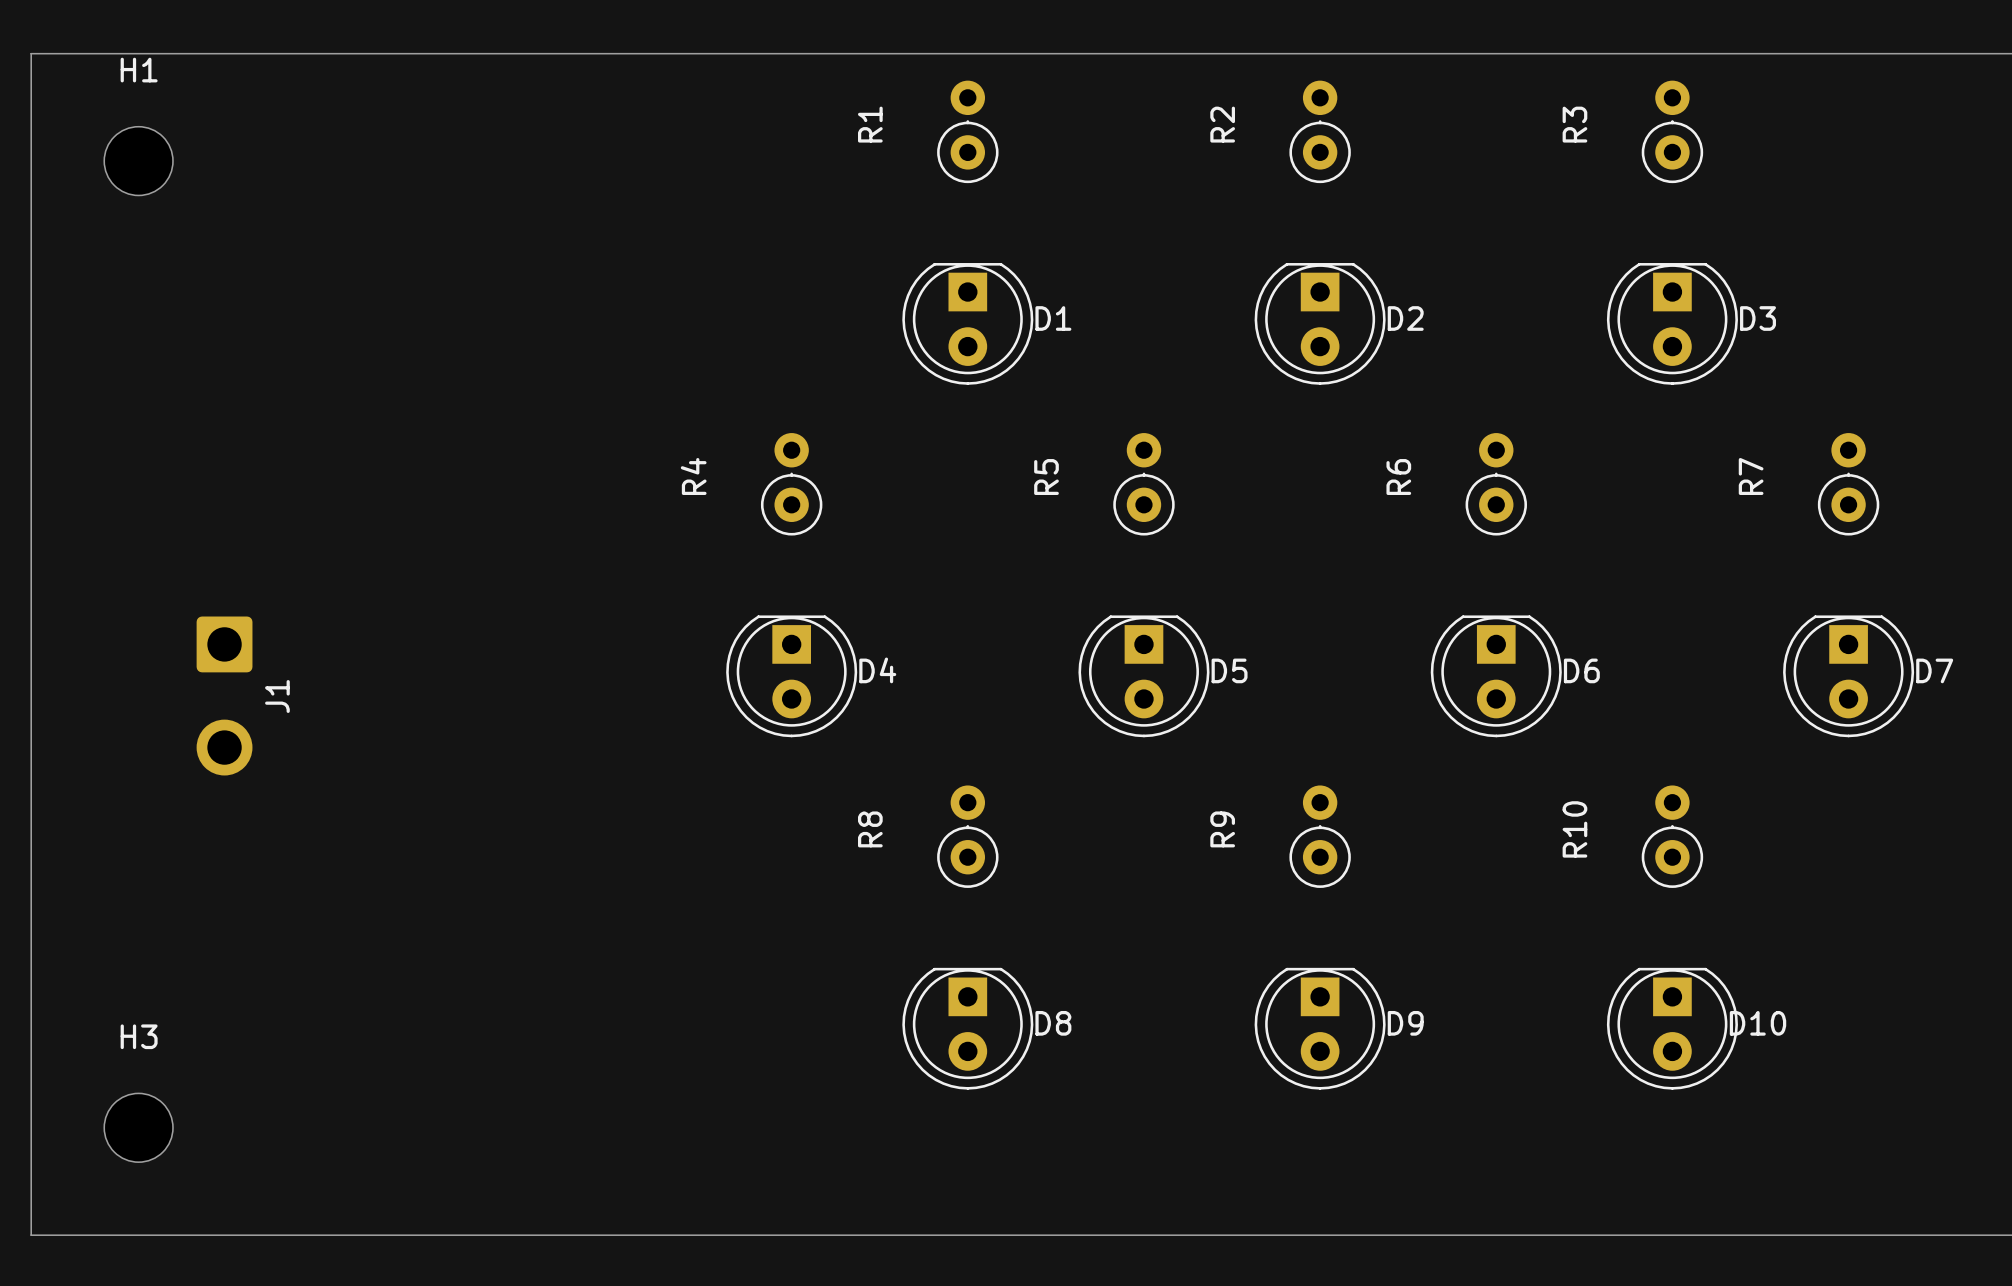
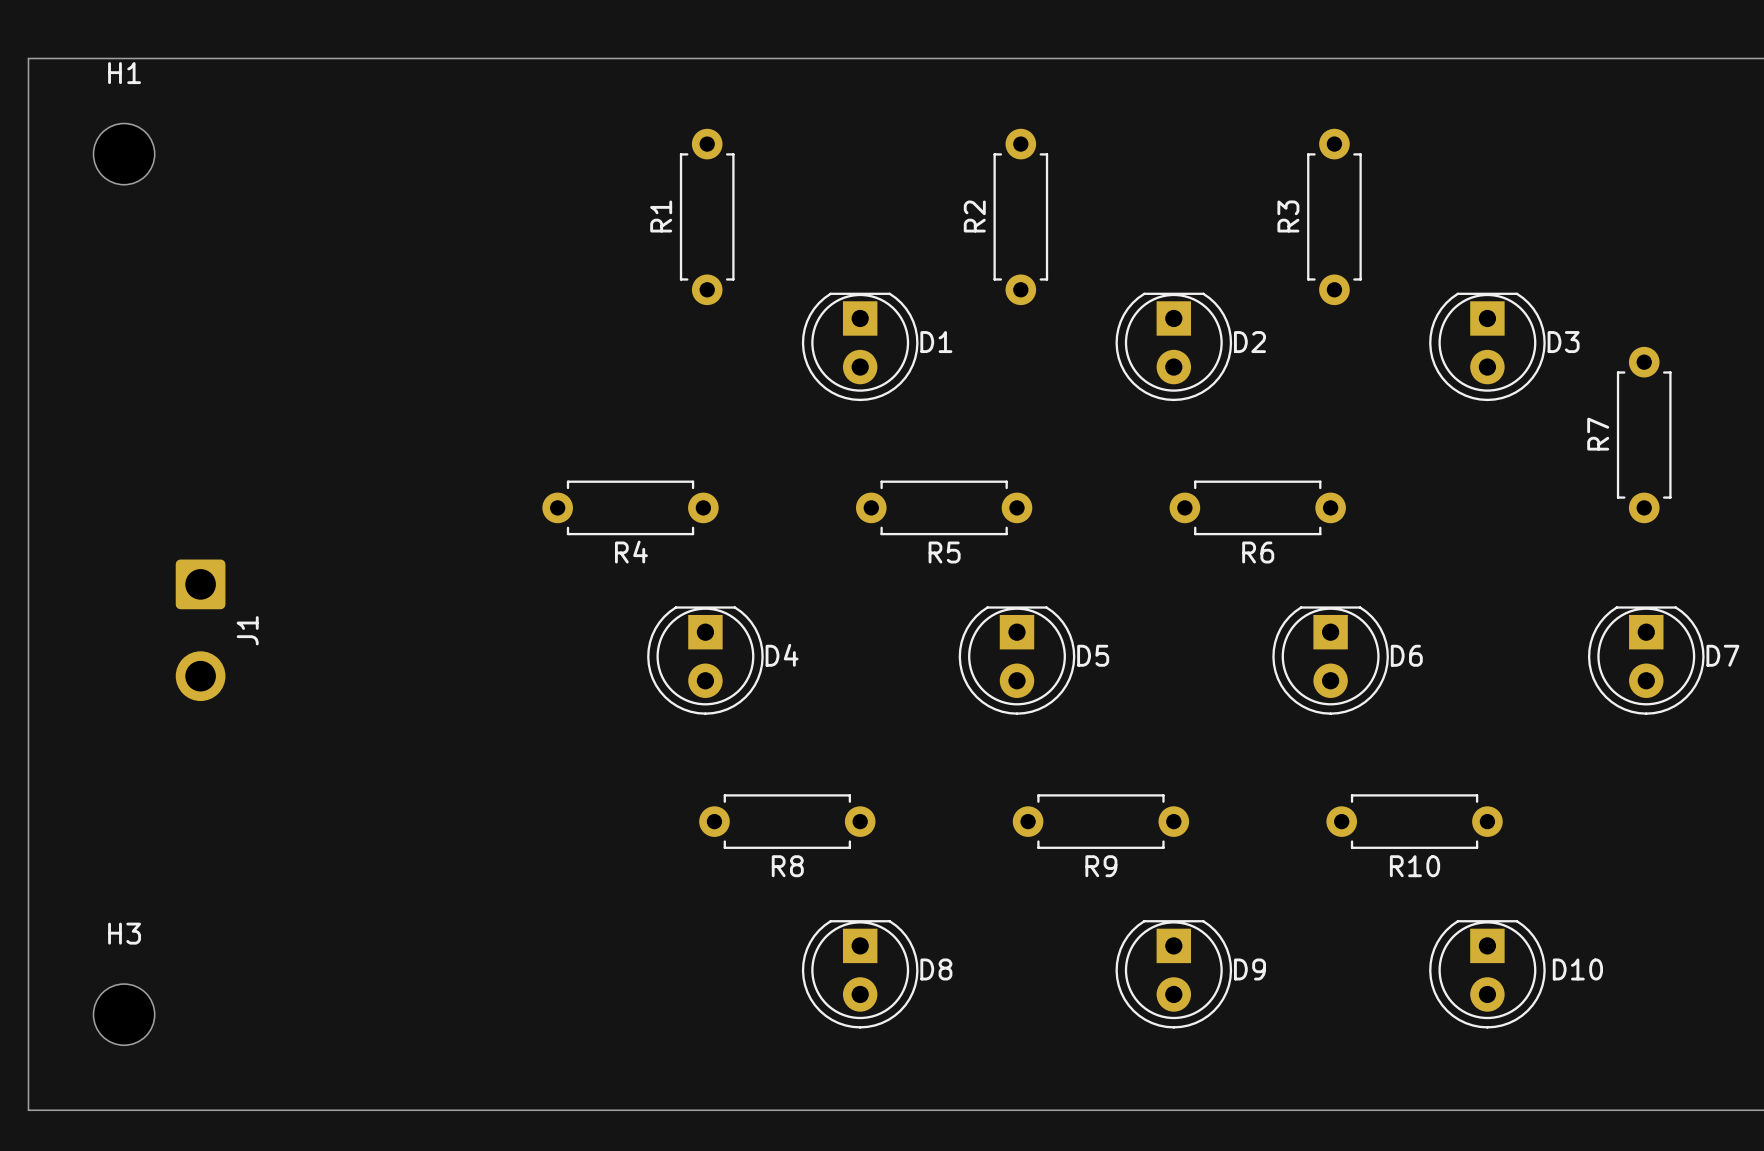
R1 footprint: [937, 80, 999, 184] -> [679, 128, 735, 306]
R2 footprint: [1289, 80, 1351, 184] -> [993, 128, 1049, 306]
R3 footprint: [1641, 80, 1704, 184] -> [1307, 128, 1362, 306]
R1 name position: R1 (870, 124) -> R1 (661, 216)
R2 name position: R2 (1222, 124) -> R2 (974, 216)
R3 name position: R3 (1574, 124) -> R3 (1288, 216)
D1 position: (967, 323) -> (860, 346)
D2 position: (1320, 323) -> (1173, 346)
D3 position: (1672, 323) -> (1487, 346)
R4 footprint: [760, 433, 823, 536] -> [542, 480, 719, 536]
R5 footprint: [1113, 433, 1175, 536] -> [855, 480, 1033, 536]
R6 footprint: [1465, 433, 1527, 536] -> [1169, 480, 1346, 536]
R7 footprint: [1817, 433, 1880, 536] -> [1616, 346, 1672, 524]
R4 name position: R4 (693, 476) -> R4 (631, 552)
R7 name position: R7 (1751, 476) -> R7 (1598, 434)
R5 name position: R5 (1046, 477) -> R5 (944, 552)
R6 name position: R6 (1398, 477) -> R6 (1258, 552)
D4 position: (791, 676) -> (705, 660)
D5 position: (1143, 676) -> (1017, 660)
D6 position: (1496, 676) -> (1330, 660)
D7 position: (1848, 676) -> (1646, 660)
R8 footprint: [937, 785, 999, 888] -> [699, 794, 876, 849]
R9 footprint: [1289, 785, 1351, 888] -> [1012, 794, 1190, 849]
R10 footprint: [1641, 785, 1704, 888] -> [1326, 794, 1503, 849]
R8 name position: R8 (870, 829) -> R8 (787, 866)
R9 name position: R9 (1222, 829) -> R9 (1101, 866)
R10 name position: R10 (1574, 829) -> R10 (1415, 866)
D10 name position: D10 (1758, 1023) -> D10 (1577, 969)
D8 position: (967, 1028) -> (860, 974)
D9 position: (1320, 1028) -> (1173, 974)
D10 position: (1672, 1028) -> (1487, 974)

